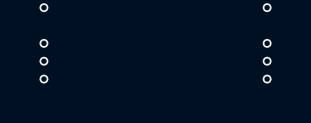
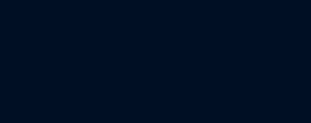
via: (43, 7) -> none
via: (267, 7) -> none
via: (43, 43) -> none
via: (267, 43) -> none
via: (43, 61) -> none
via: (267, 61) -> none
via: (43, 79) -> none
via: (267, 79) -> none

